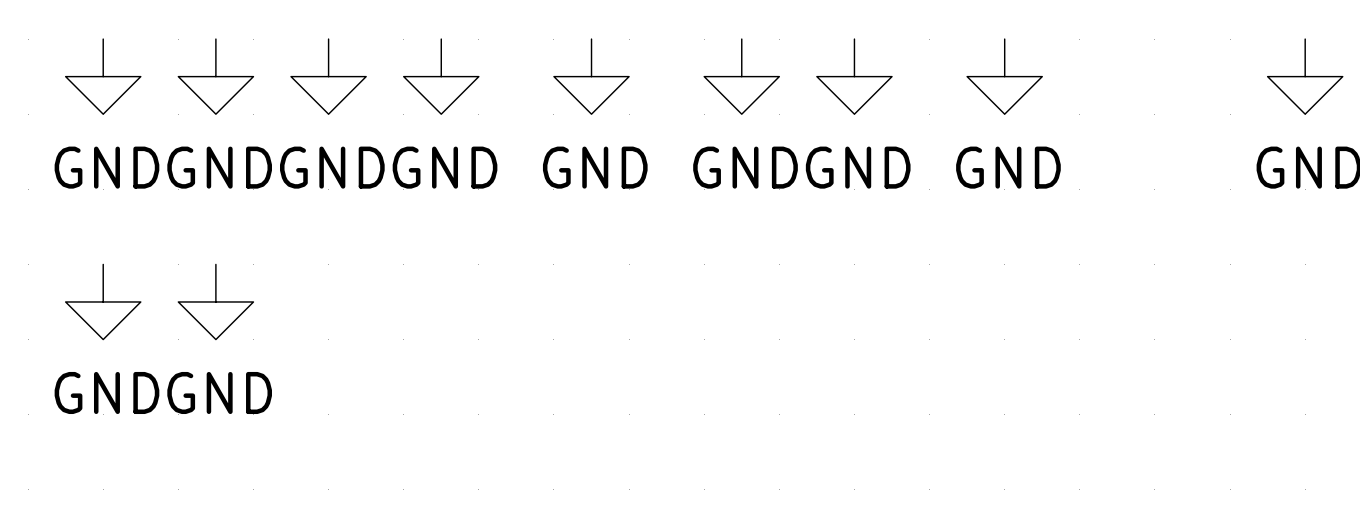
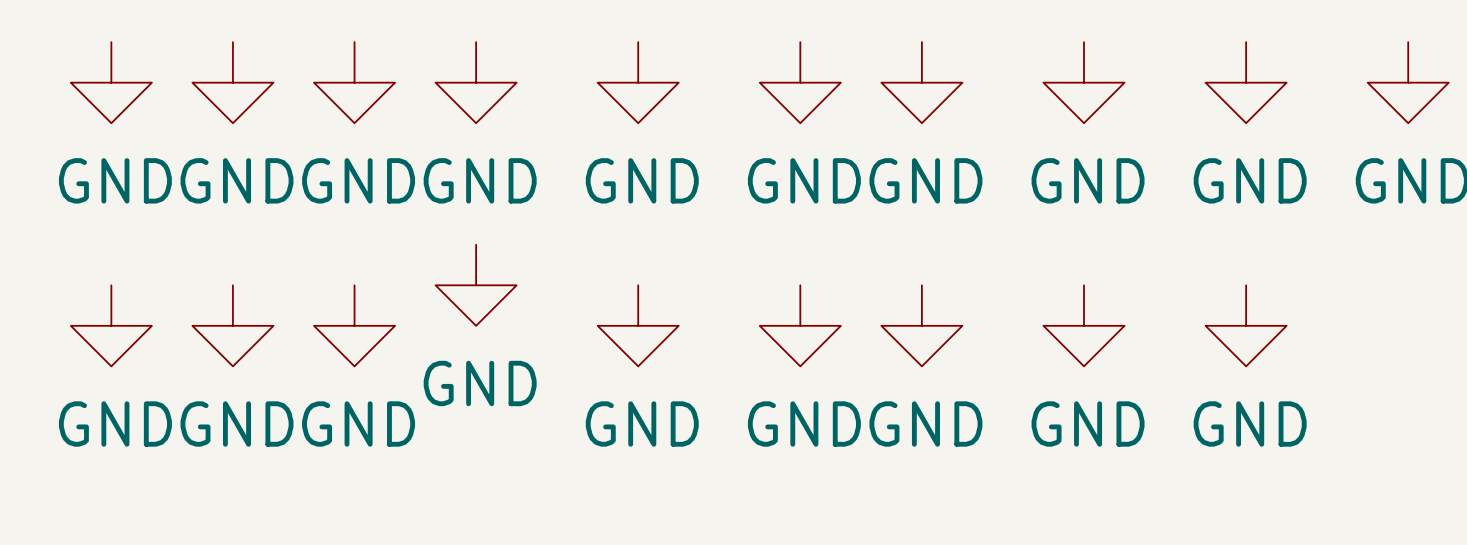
power symbol: none -> GND (1246, 82)
power symbol: none -> GND (476, 285)
power symbol: none -> GND (354, 325)
power symbol: none -> GND (638, 325)
power symbol: none -> GND (800, 325)
power symbol: none -> GND (921, 325)
power symbol: none -> GND (1084, 325)
power symbol: none -> GND (1246, 325)

